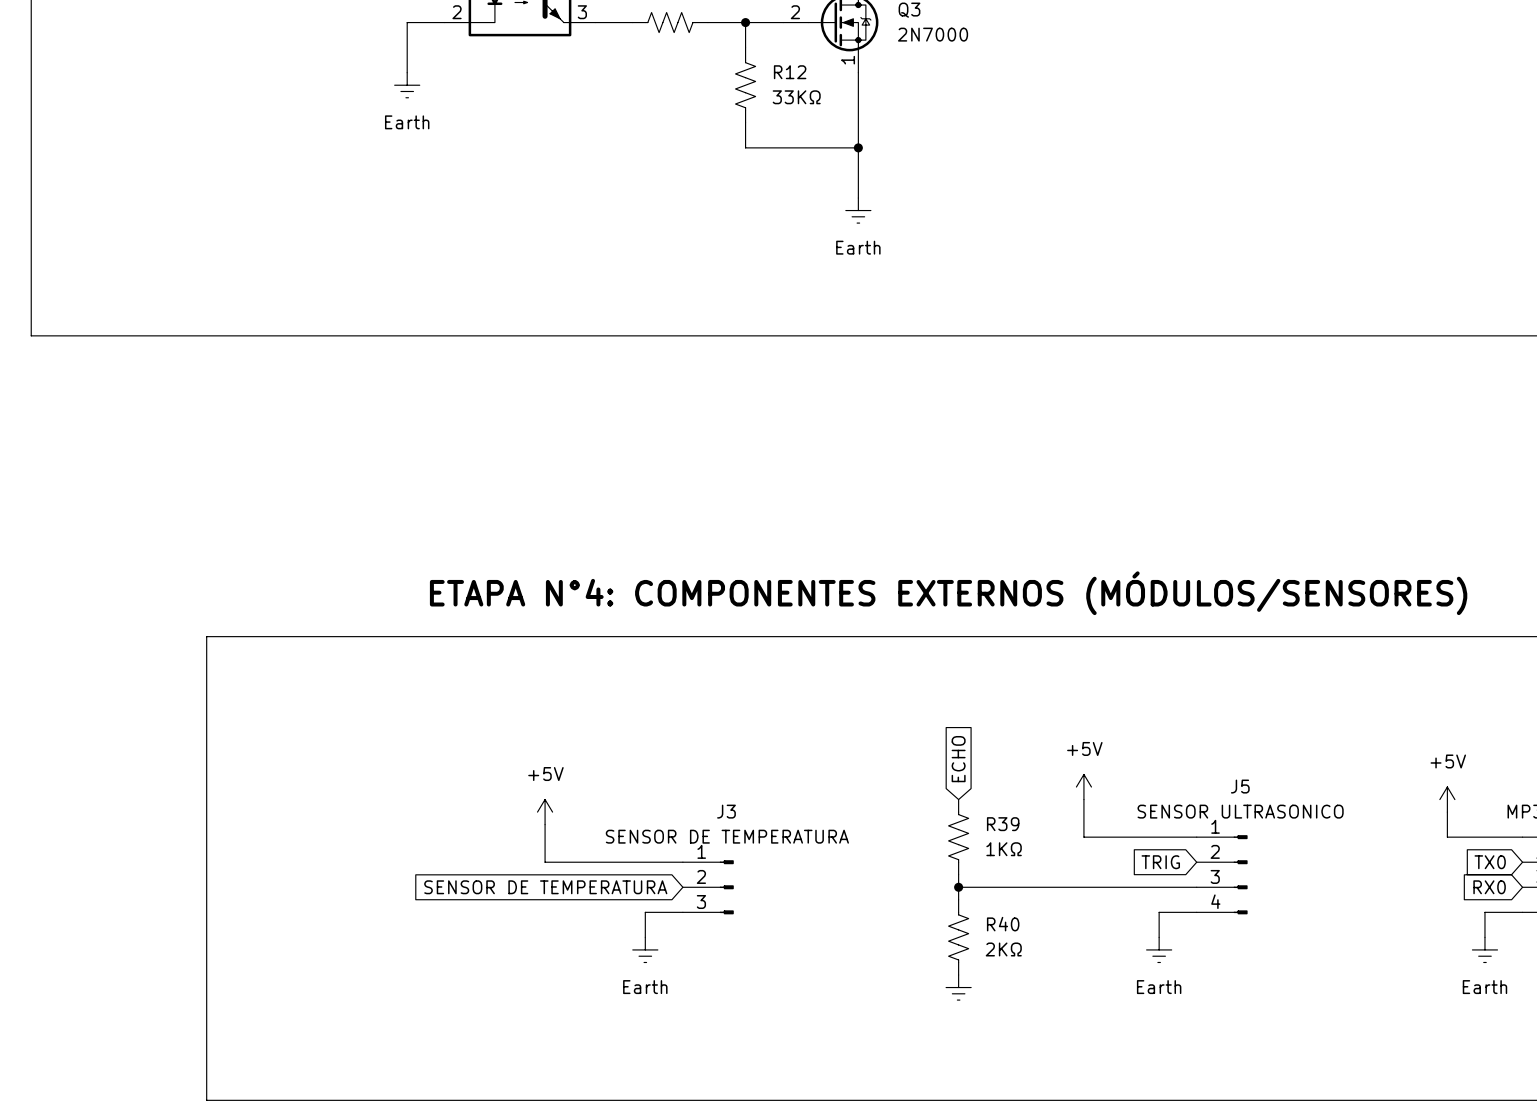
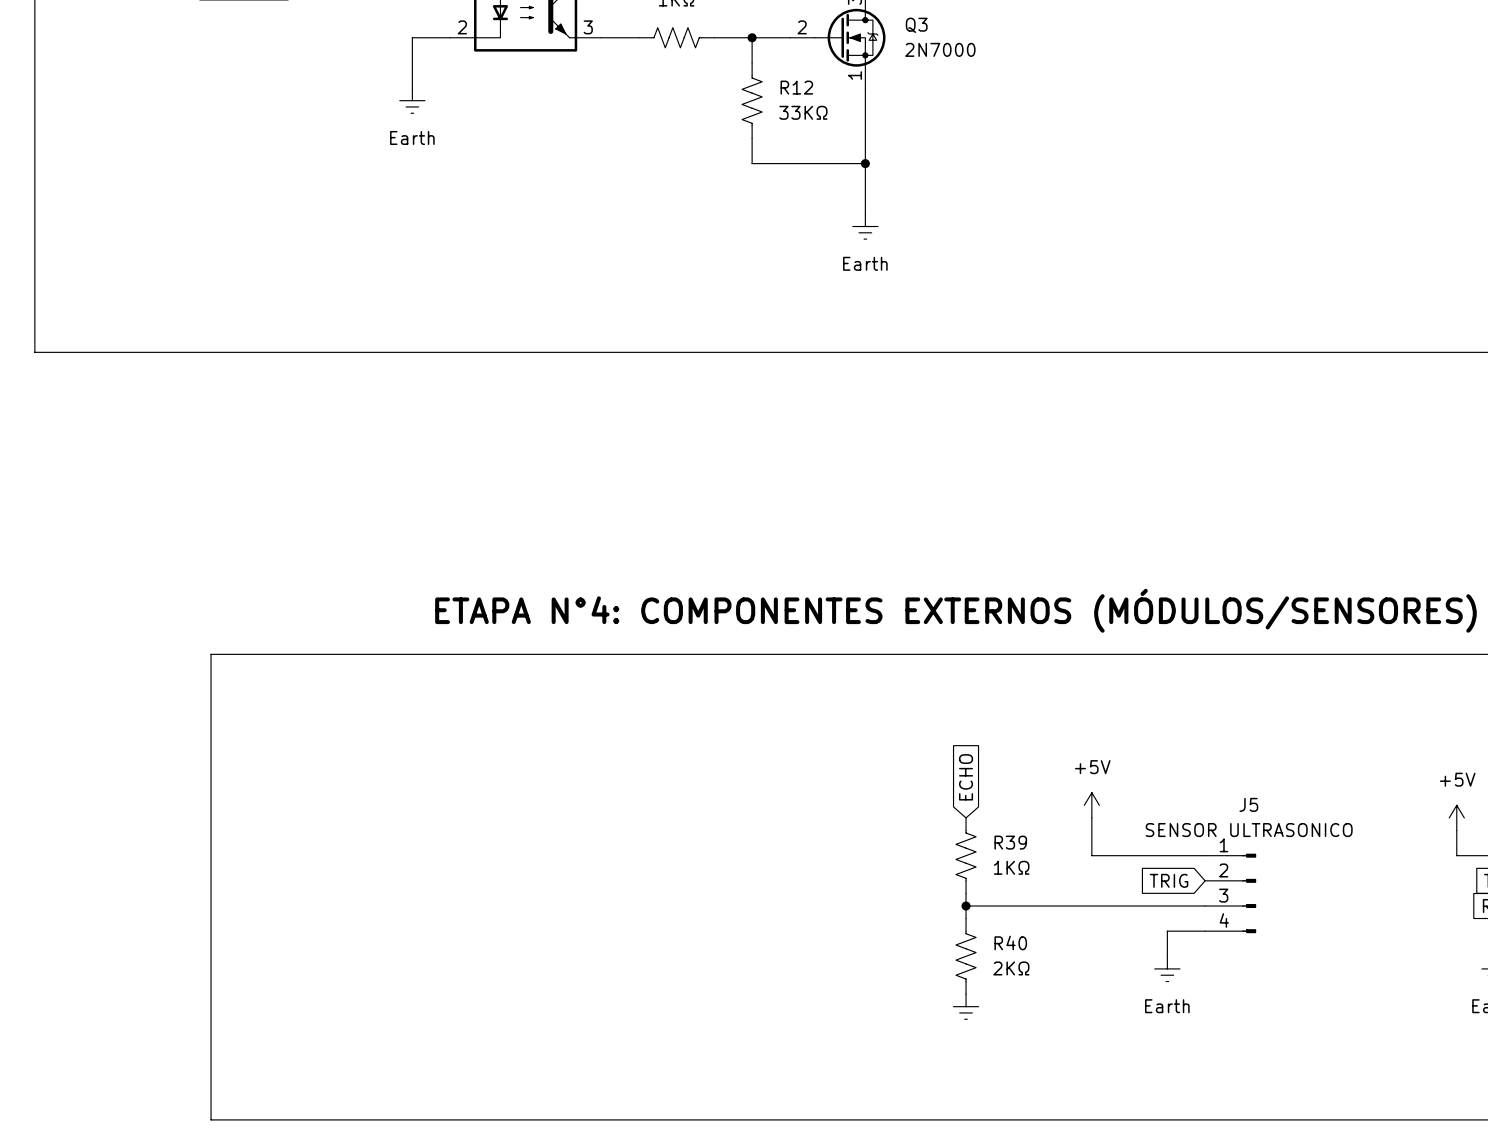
power symbol: +5V (545, 812) -> none
wire: (545, 824) (545, 862) (682, 862) -> none
global label: SENSOR DE TEMPERATURA (545, 887) -> none
J3: SENSOR DE TEMPERATURA (708, 887) -> none
wire: (682, 912) (645, 912) (645, 937) -> none
power symbol: Earth (645, 949) -> none

